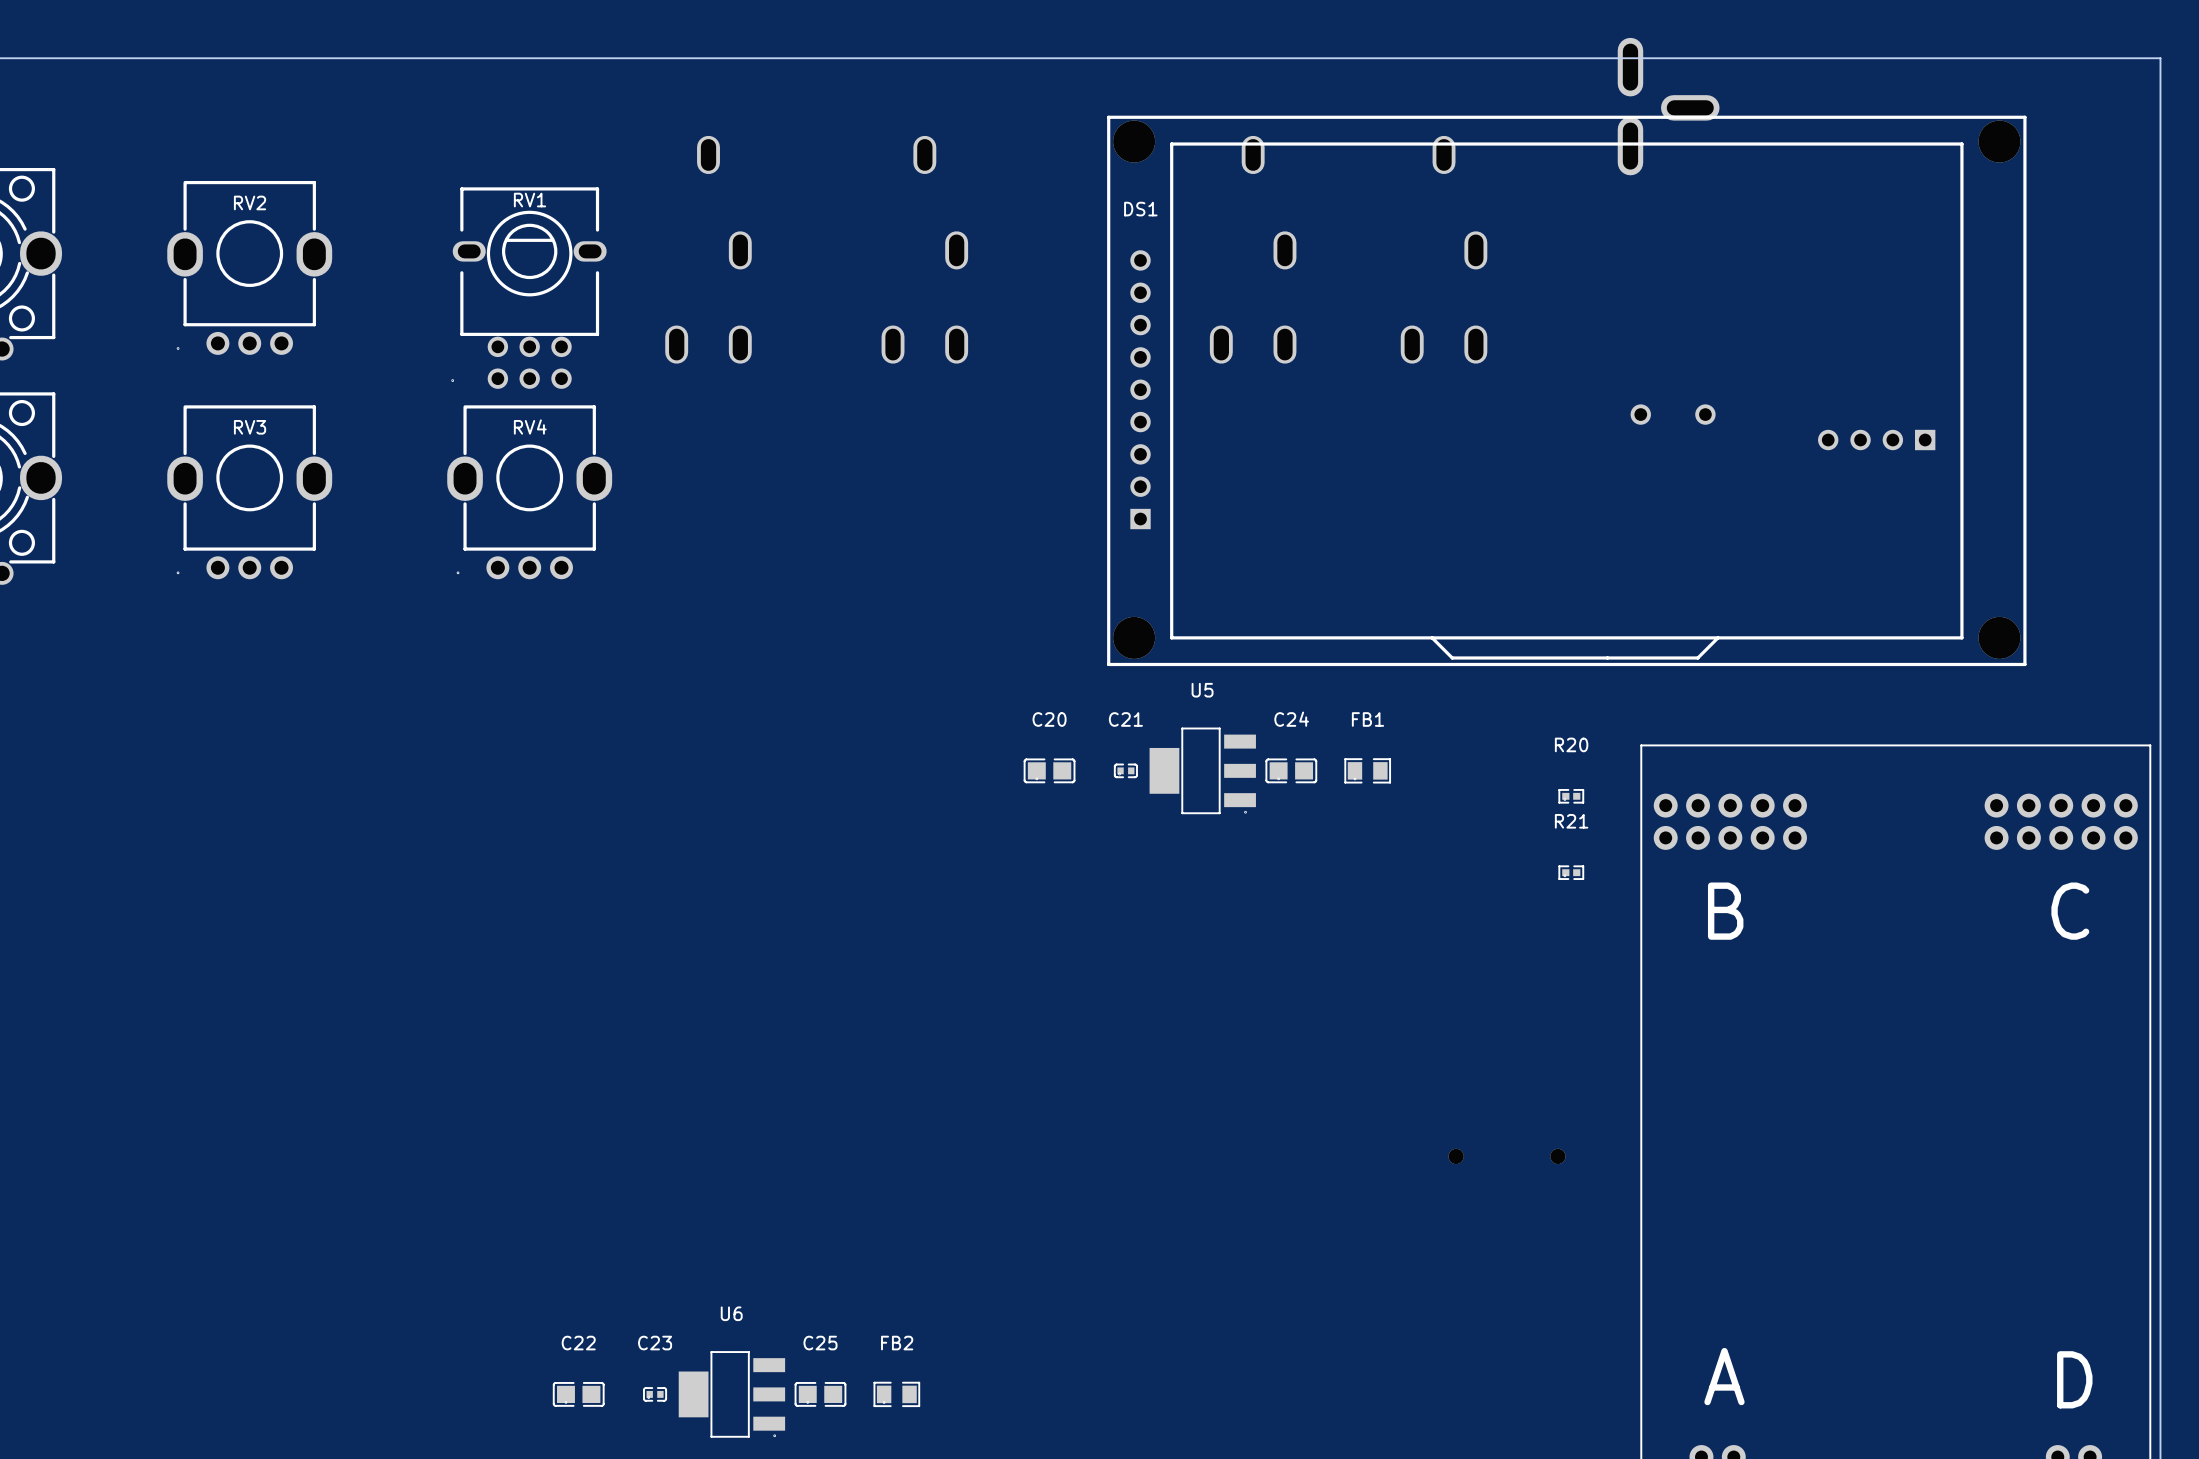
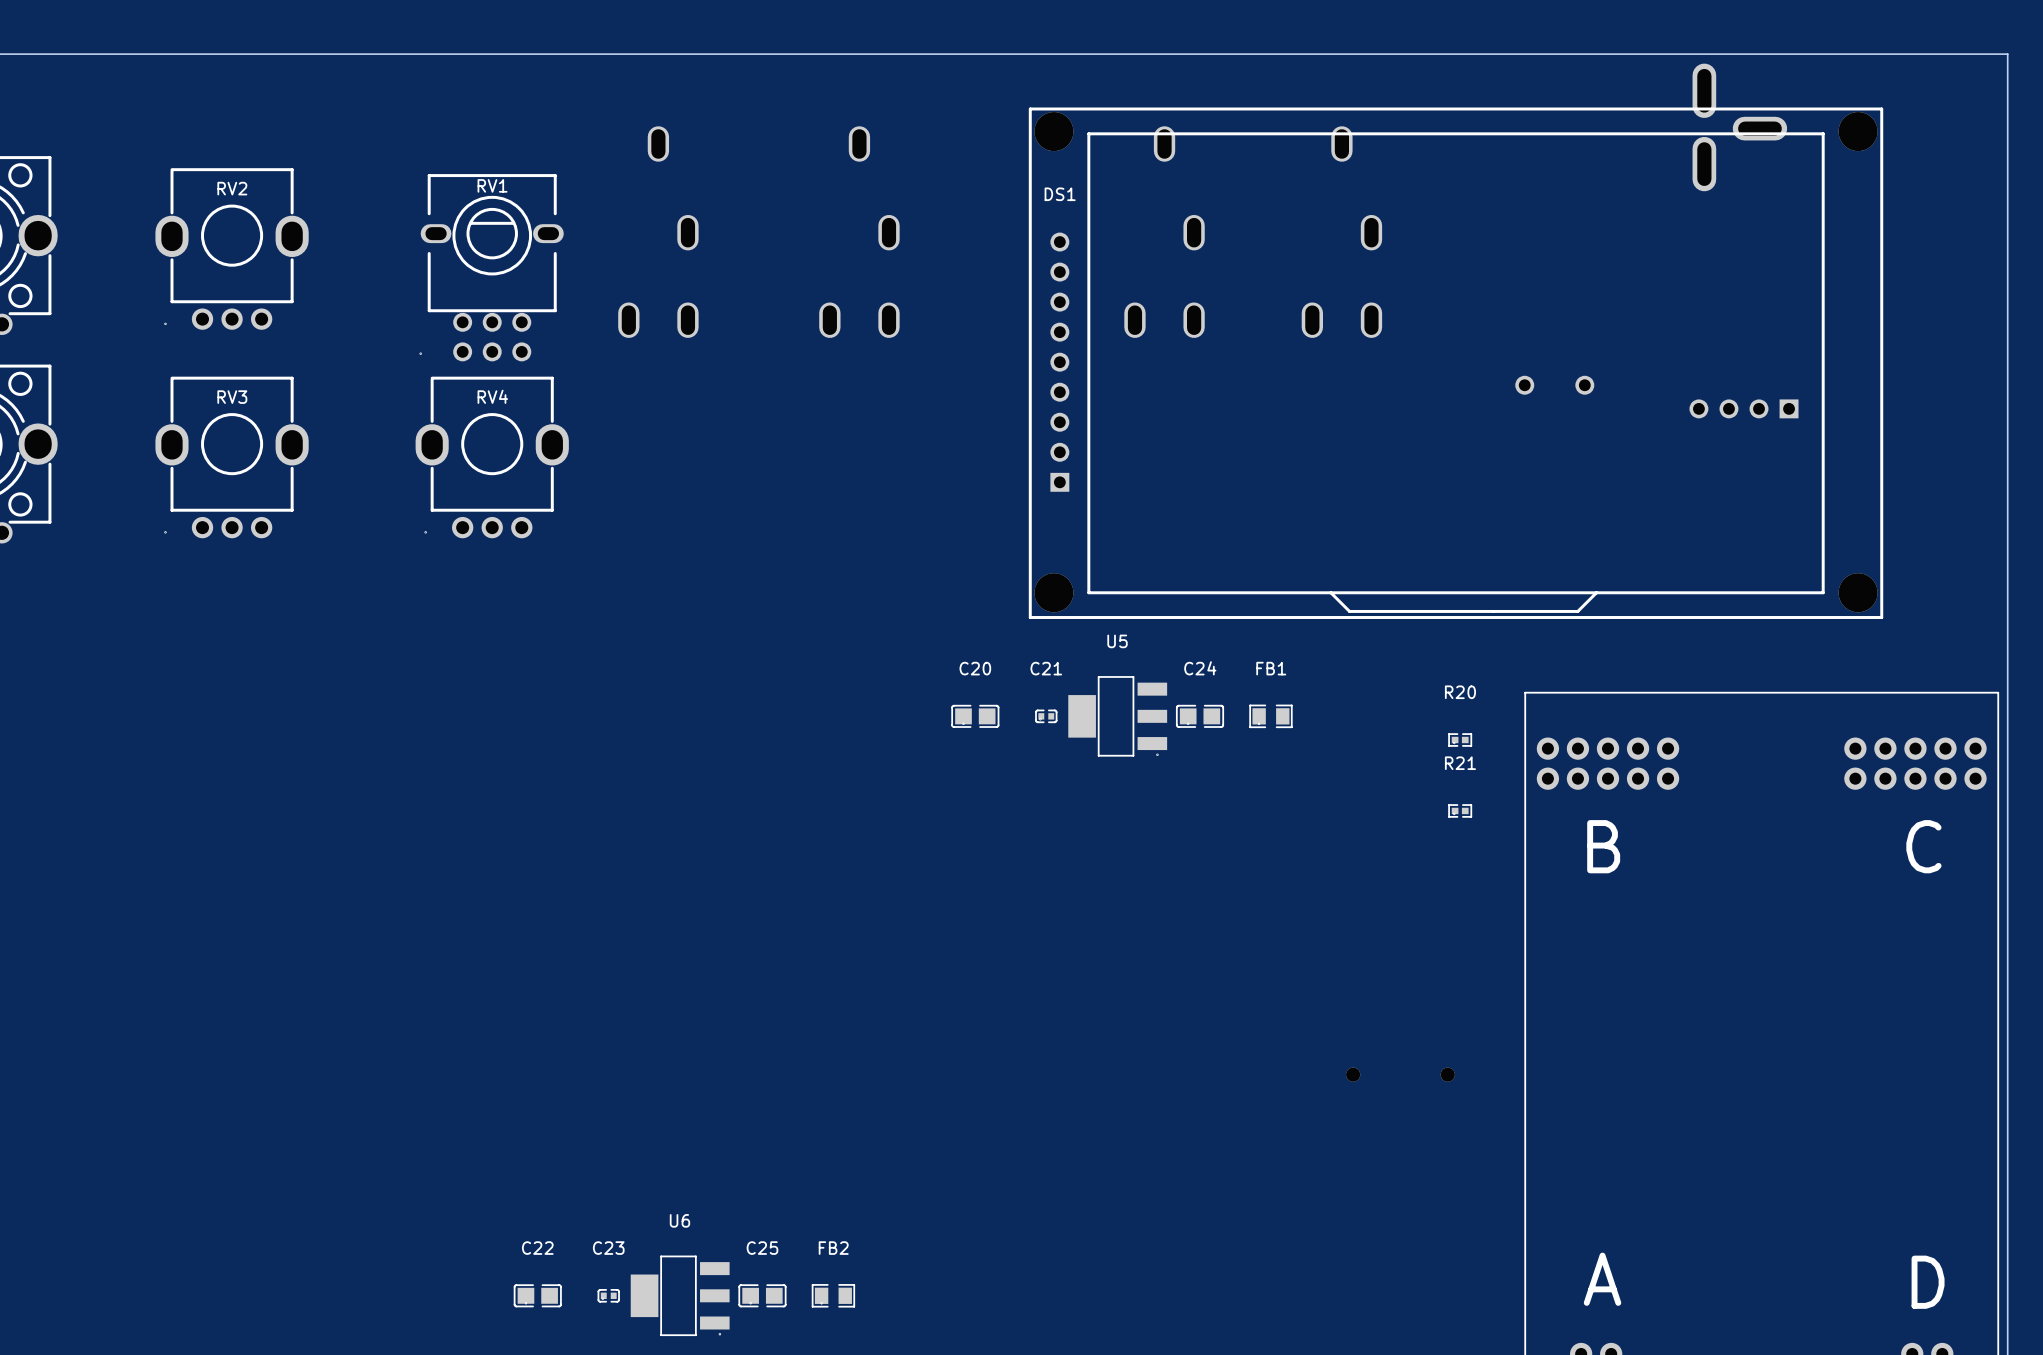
part position: (1668, 106) -> (1739, 127)

